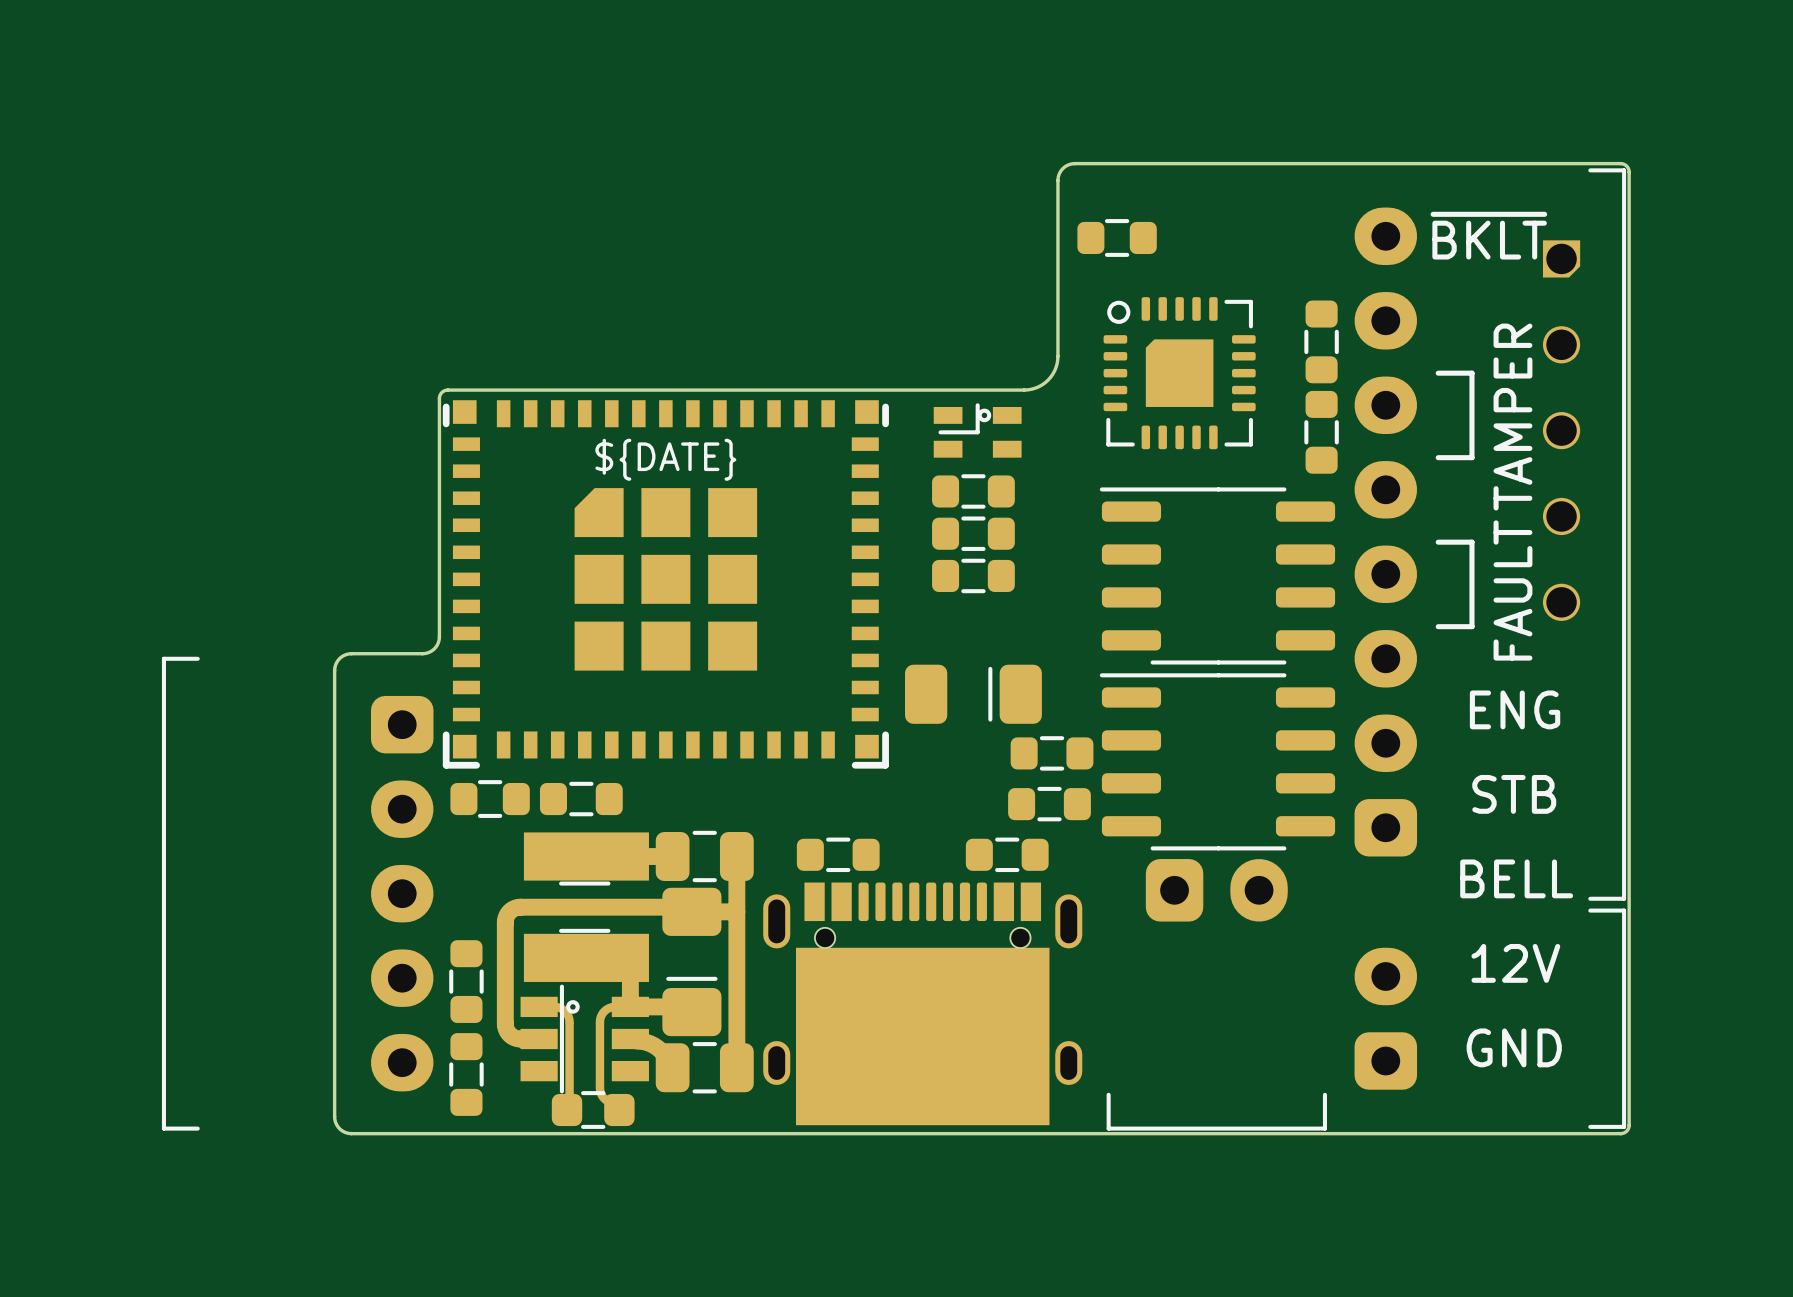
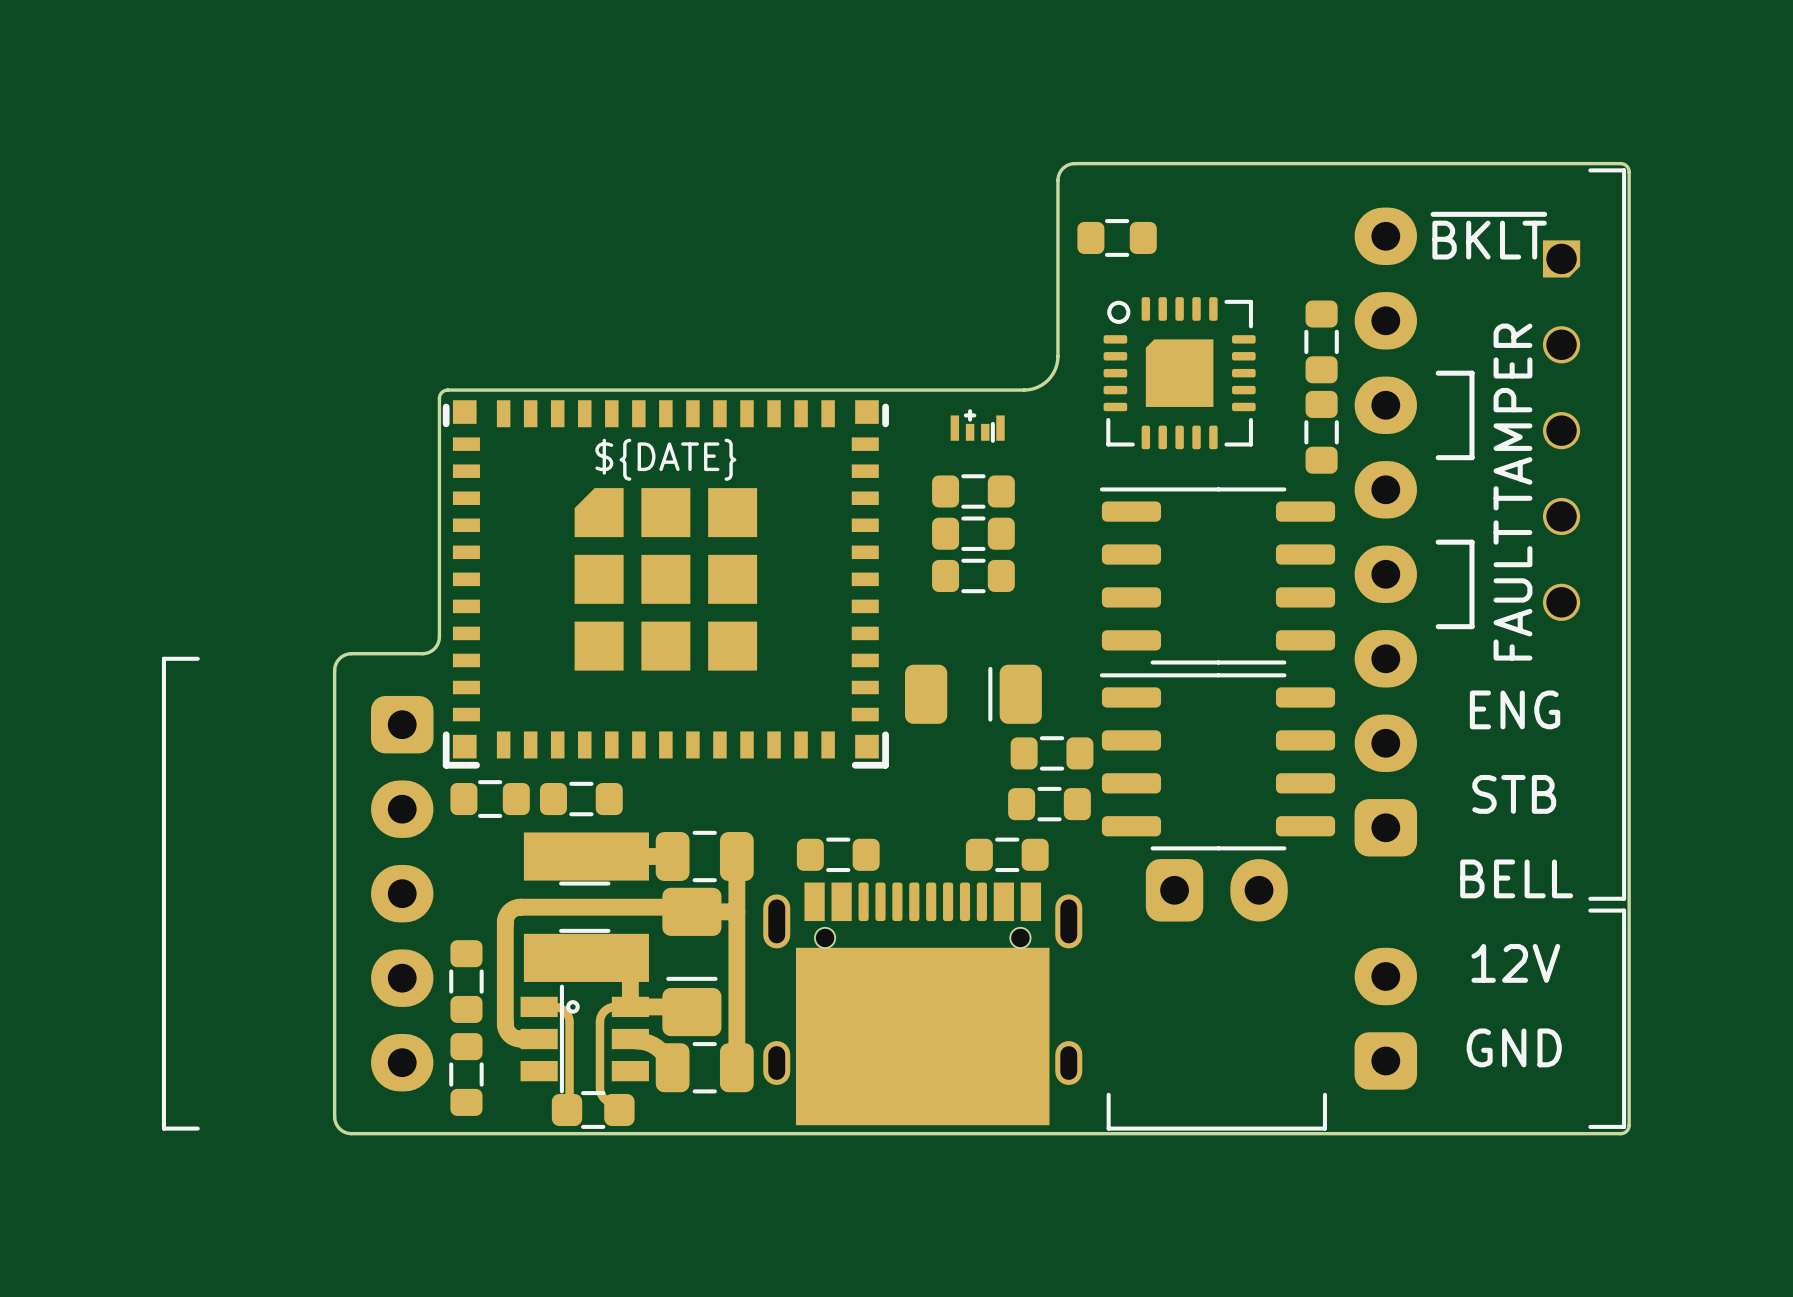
part footprint: [933, 403, 1022, 458] -> [950, 409, 1005, 443]

